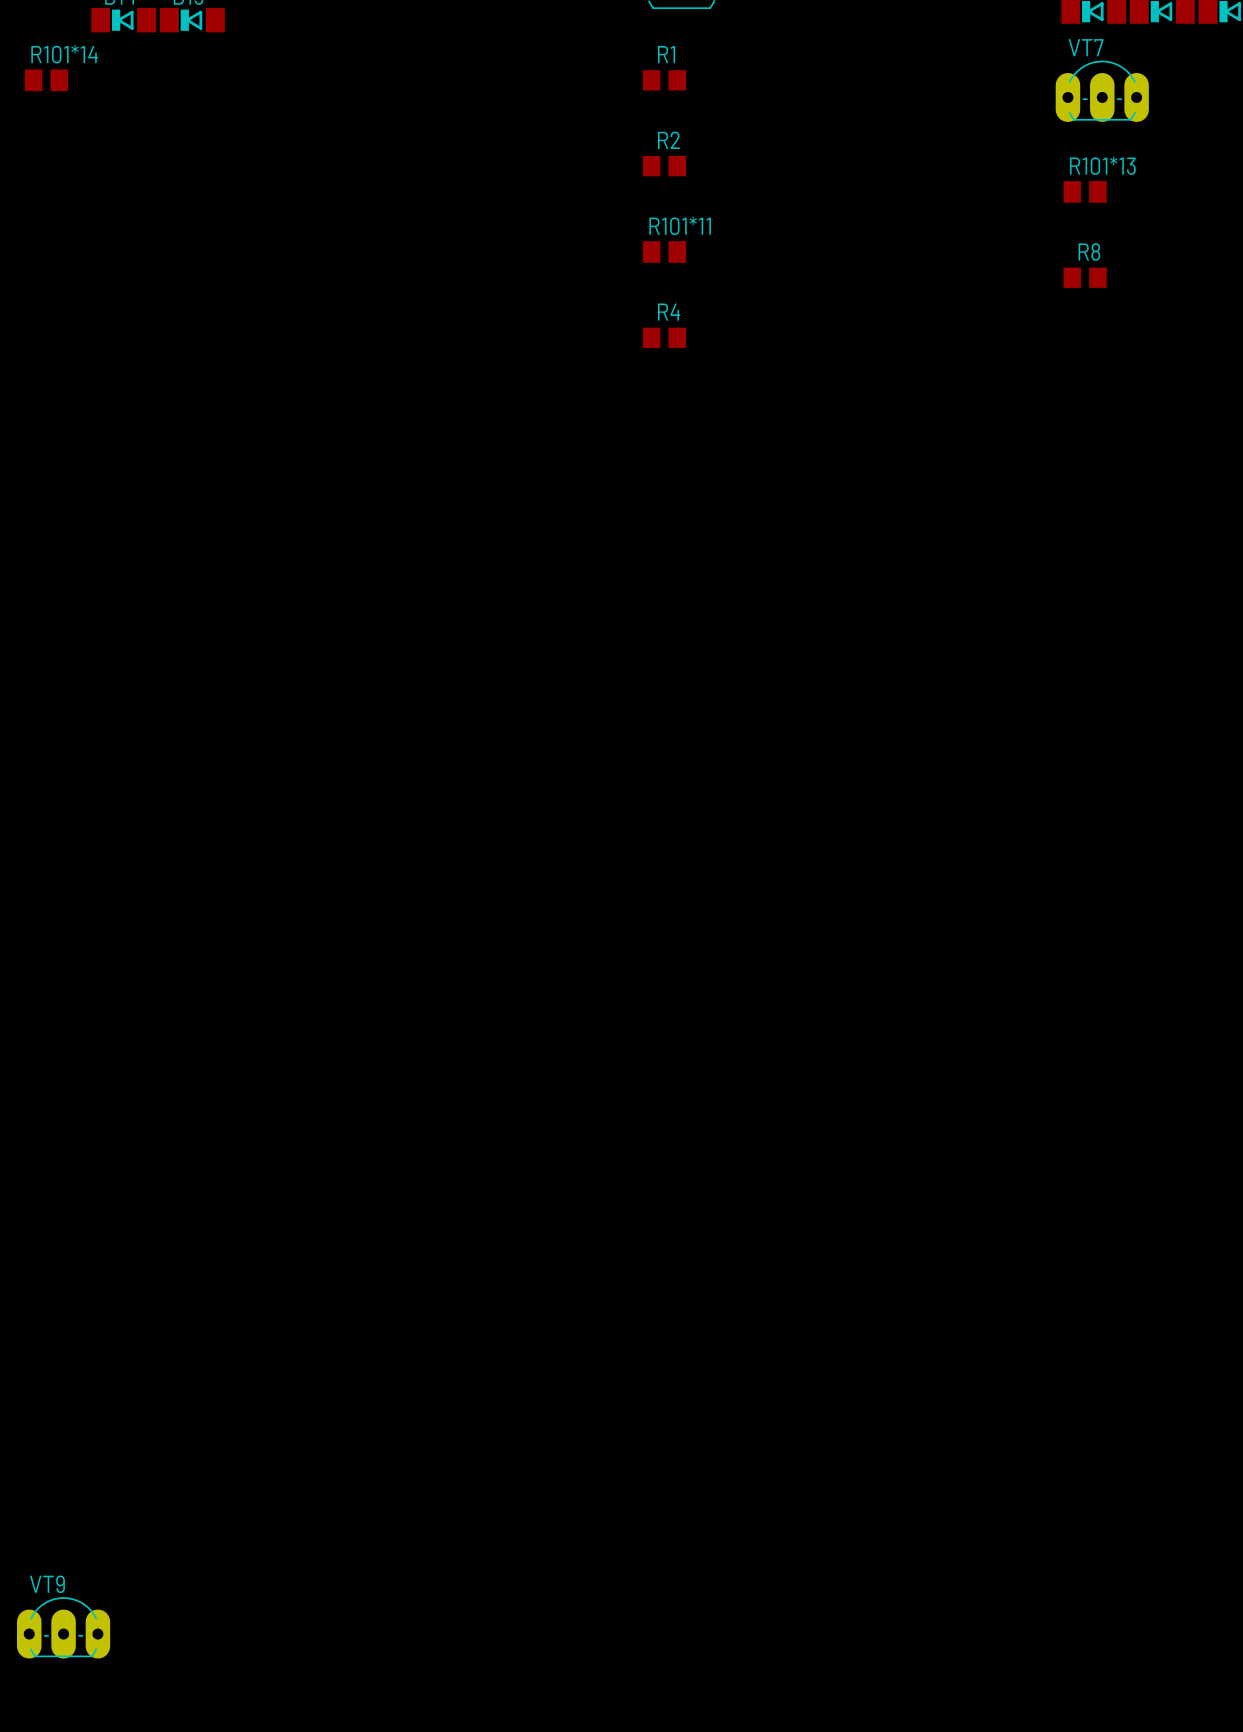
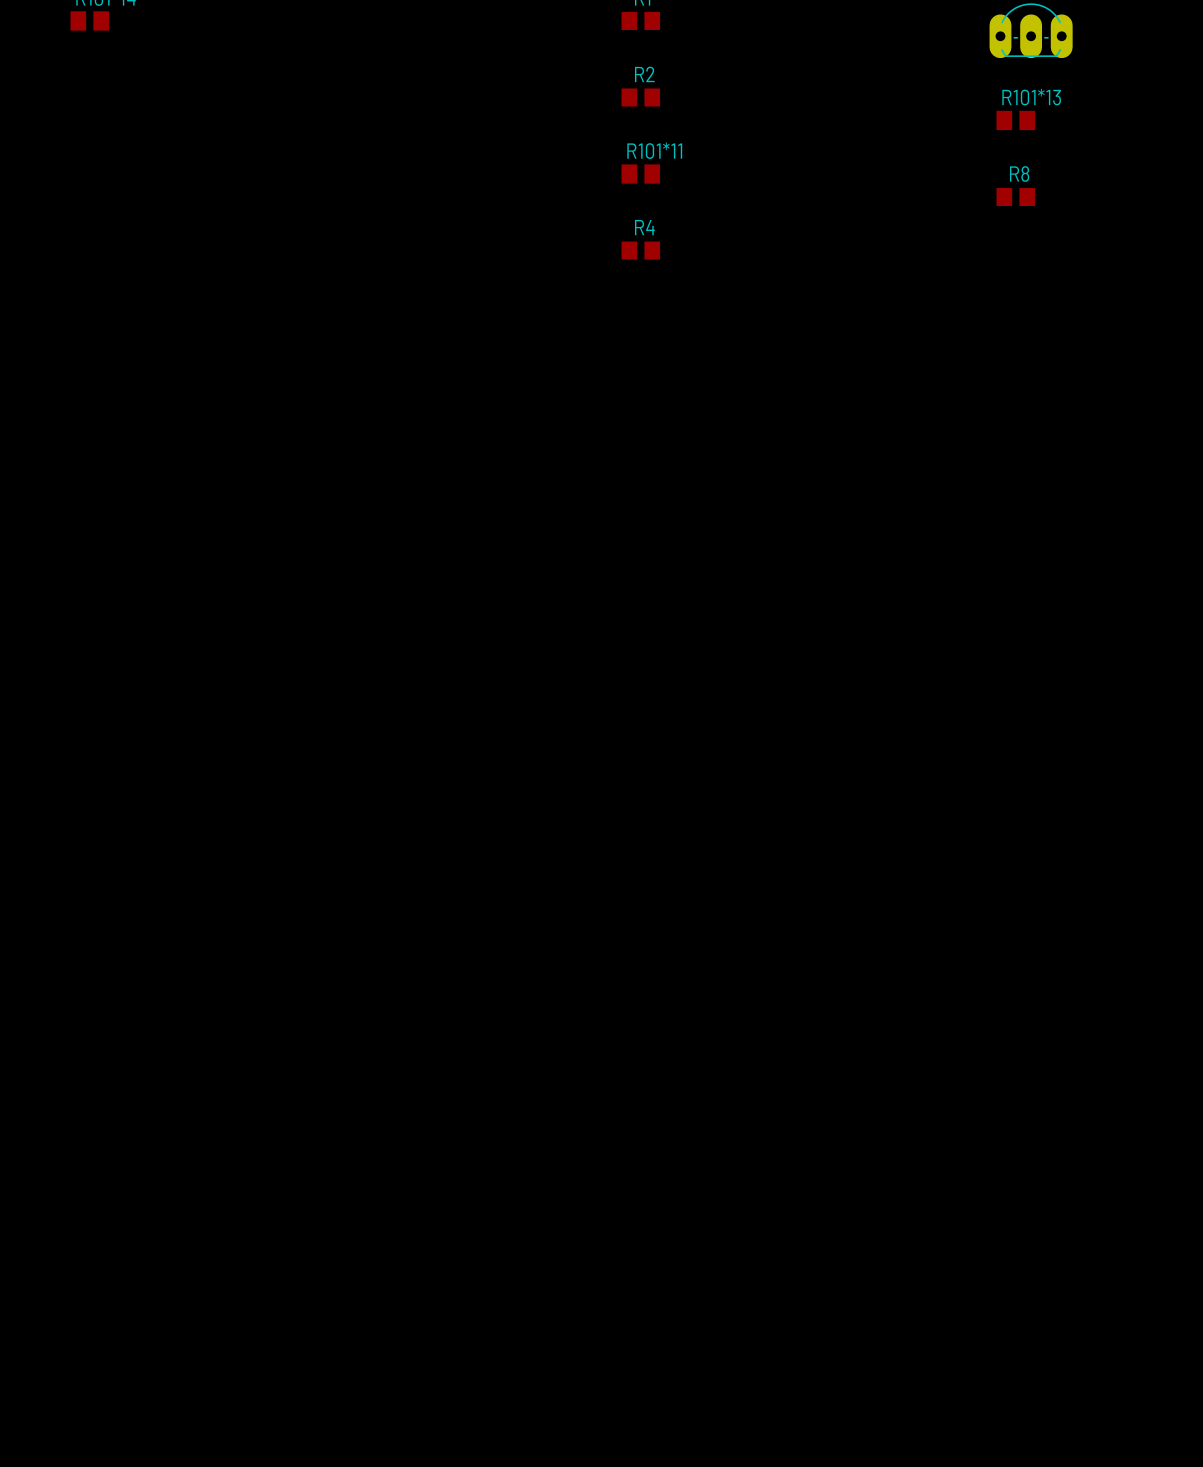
VT9: (63, 1627) -> none

